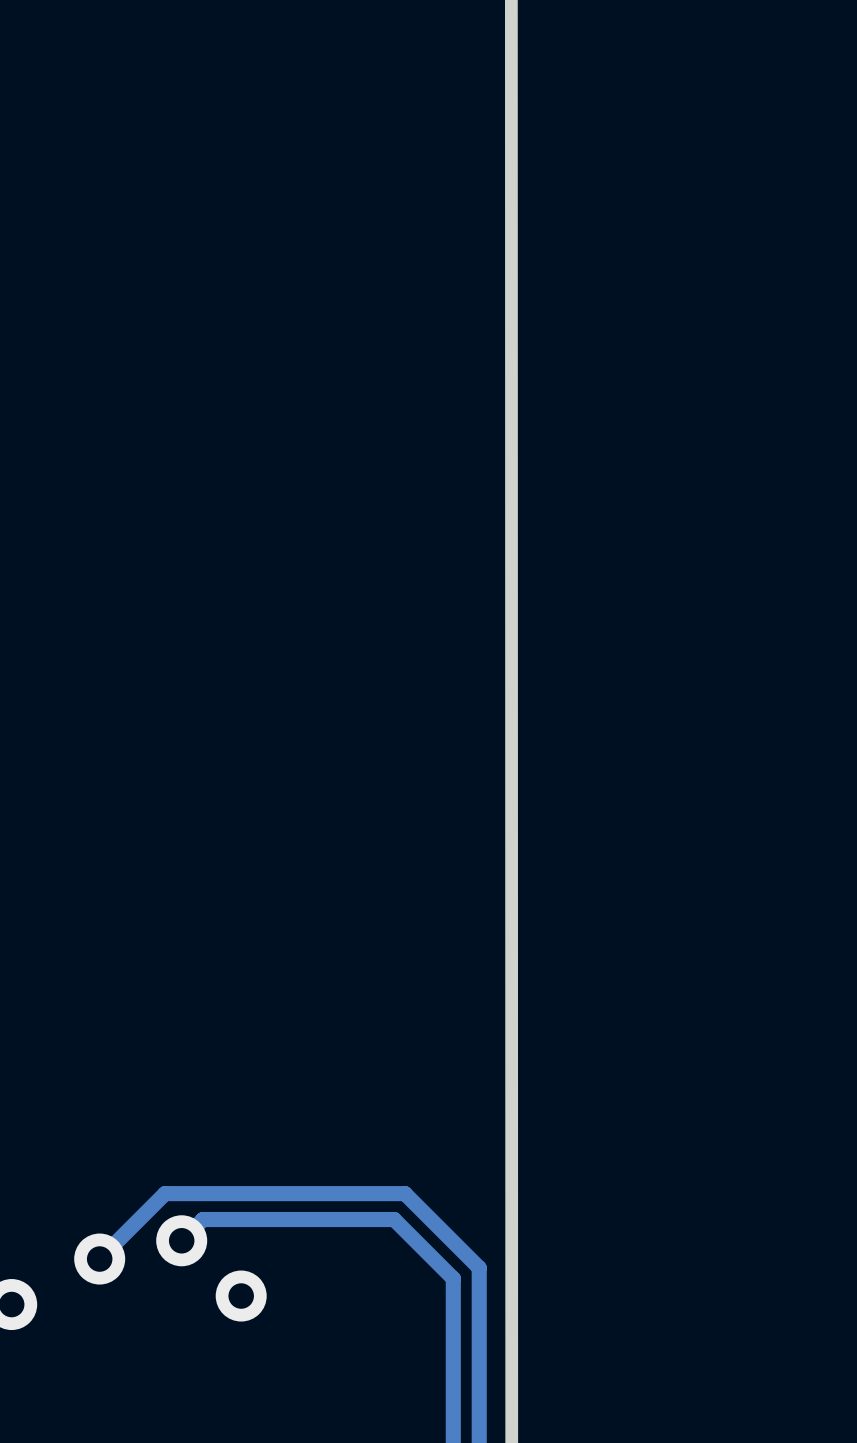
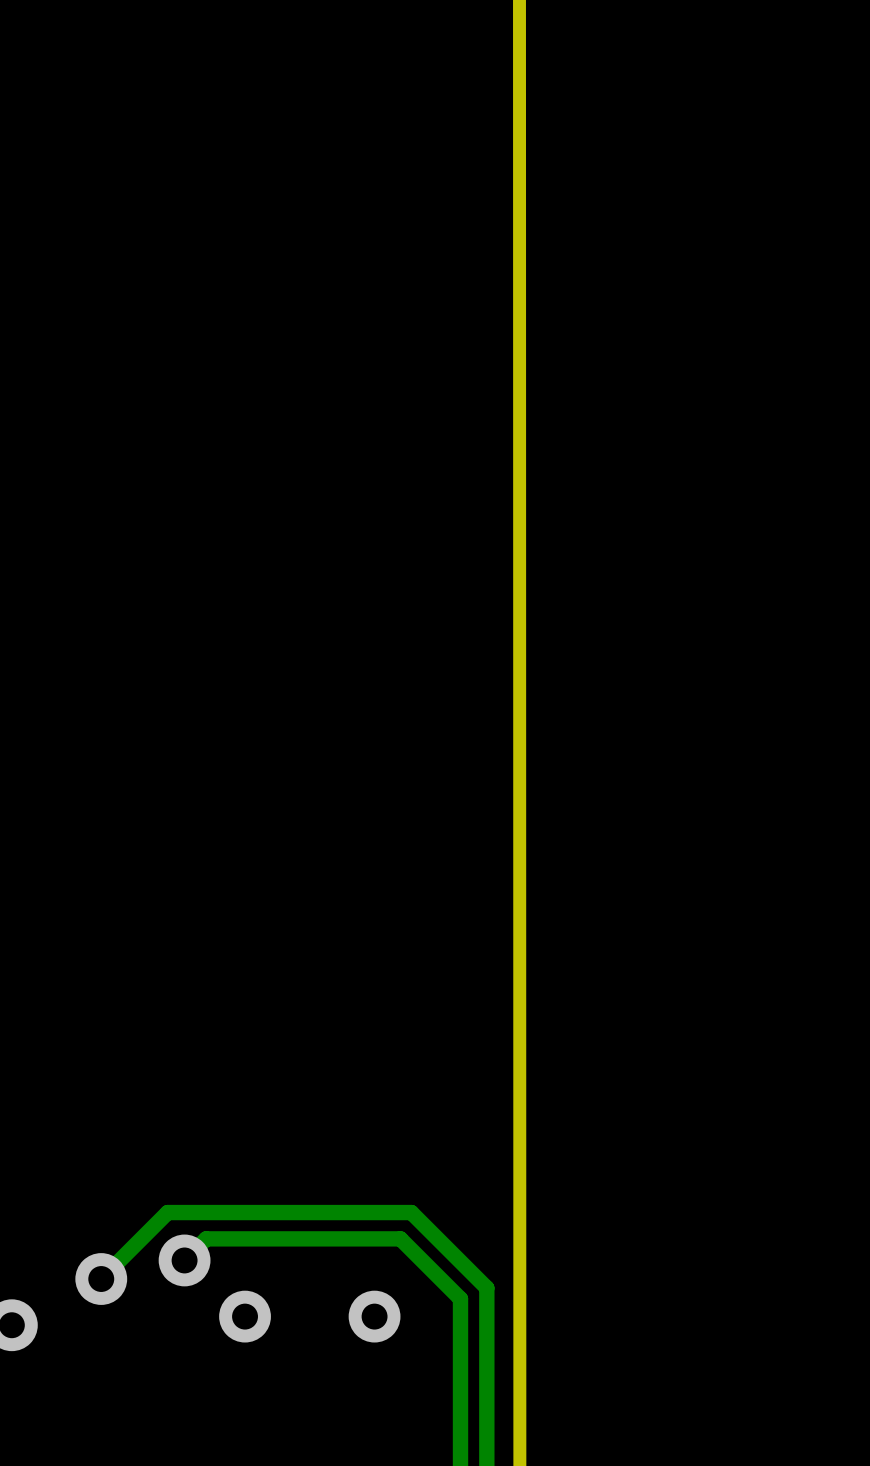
via: none -> (374, 1316)

